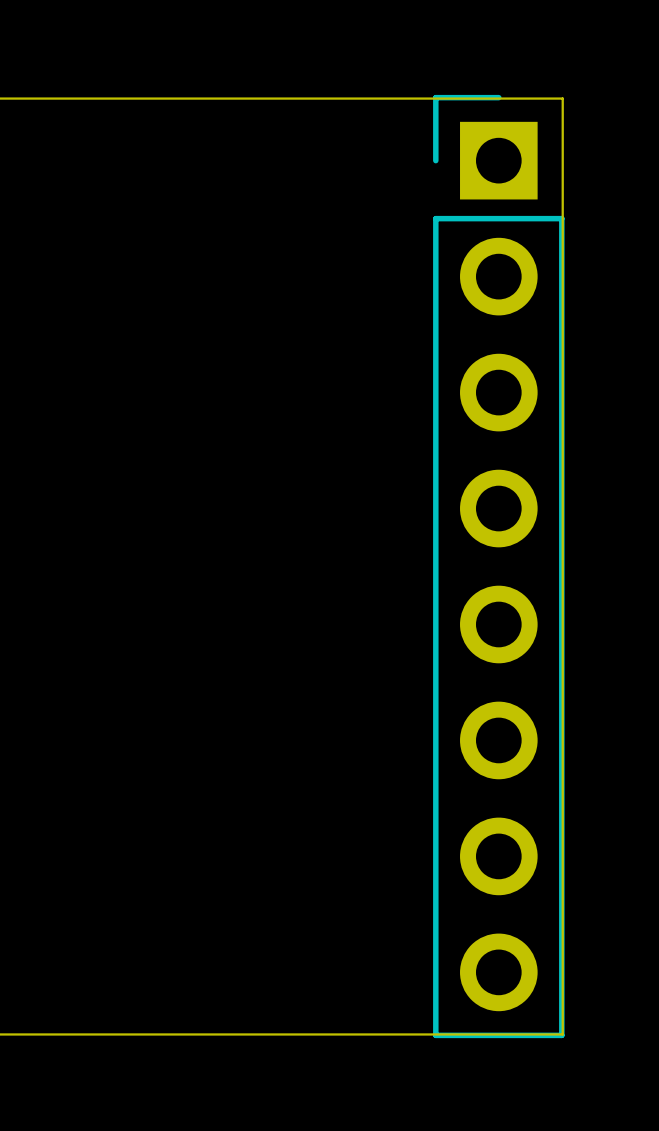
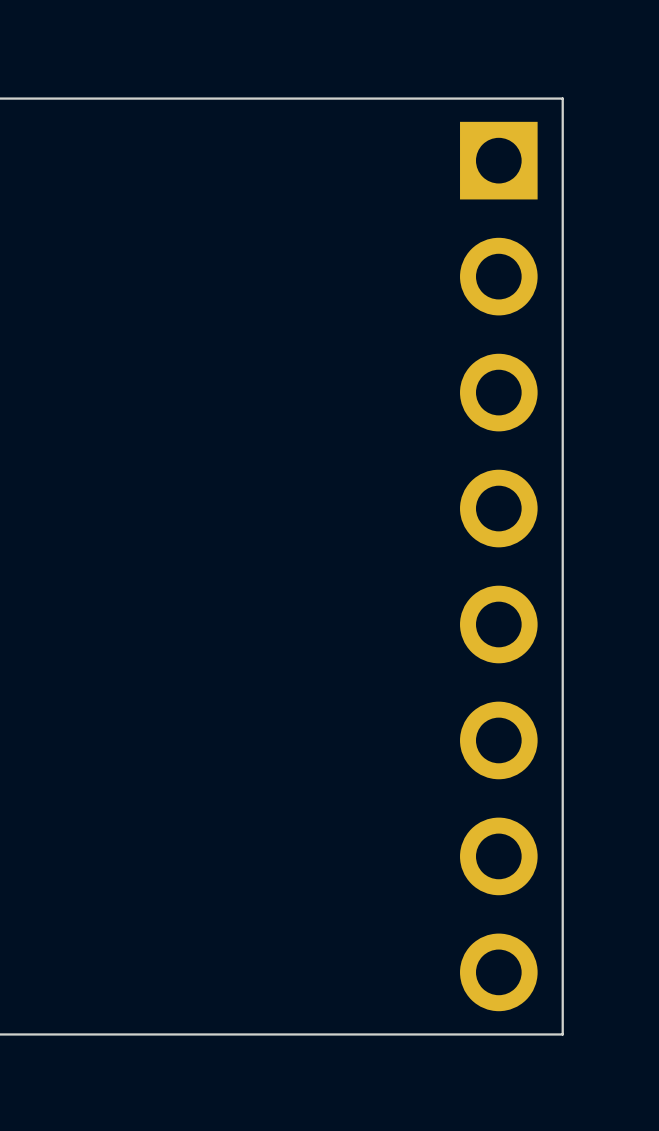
part side: bottom (498, 566) -> top (498, 566)

